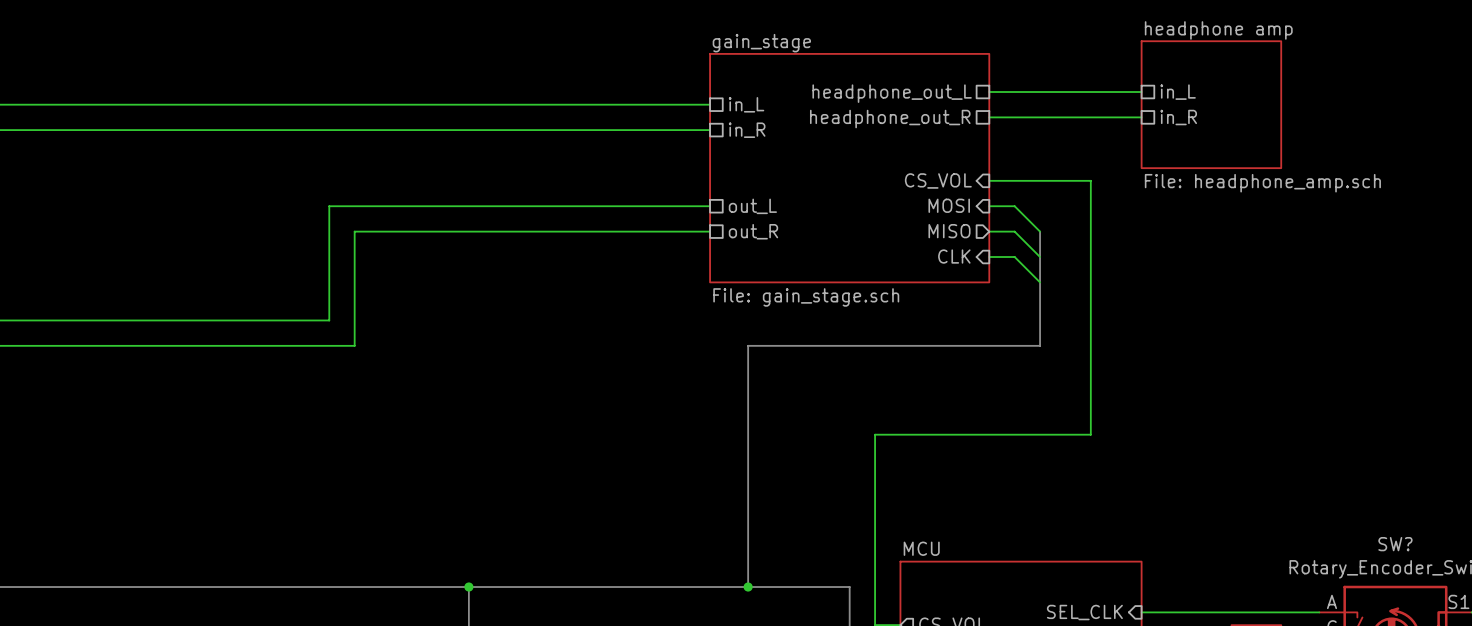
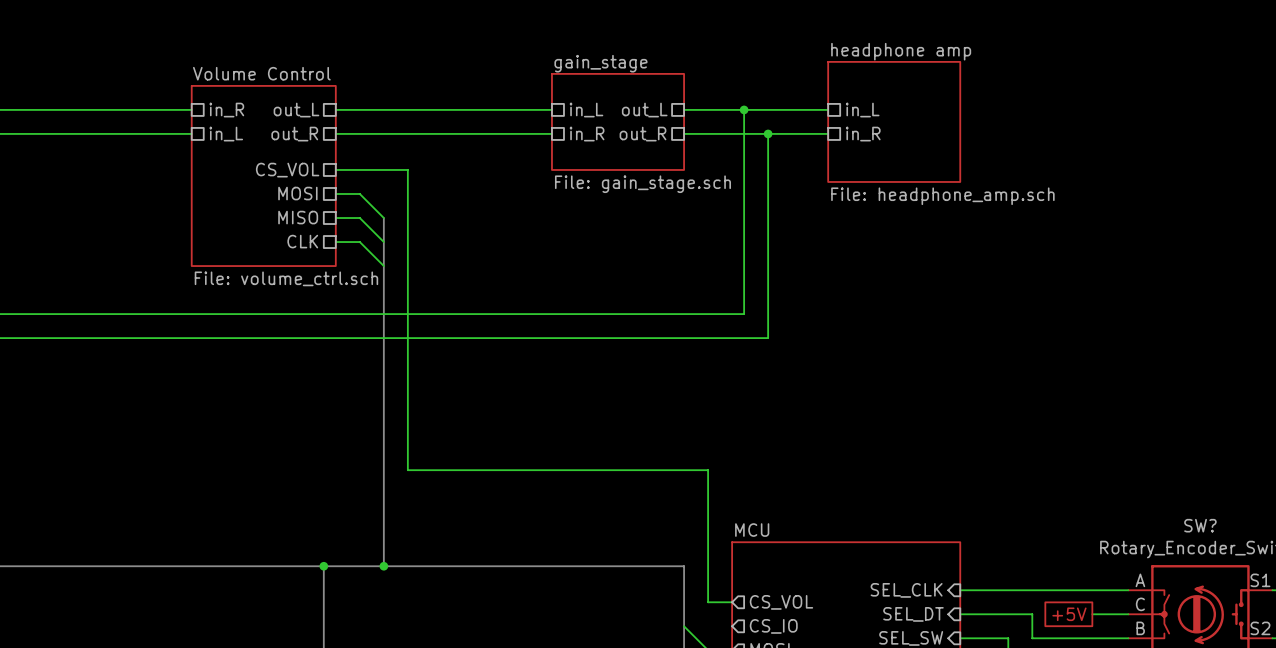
wire: (989, 92) (1141, 92) -> (684, 109) (828, 109)
sheet pin position: in_L (1178, 92) -> in_L (862, 110)
sheet pin: headphone_out_L (892, 93) -> none
wire: (329, 104) (481, 104) -> none
sheet pin: none -> in_R (226, 110)
sheet pin: none -> out_L (296, 110)
sheet pin: none -> out_L (644, 110)
junction: none -> (744, 109)
sheet headphone amp position: (1211, 104) -> (894, 121)
sheet gain_stage: none -> File: gain_stage.sch (618, 121)
wire: (989, 117) (1141, 117) -> (684, 133) (828, 133)
sheet pin position: in_R (1178, 117) -> in_R (863, 134)
sheet pin: headphone_out_R (890, 119) -> none
wire: (329, 130) (481, 130) -> none
sheet pin: none -> in_L (226, 134)
sheet pin: none -> out_R (294, 134)
sheet pin: none -> out_R (642, 134)
junction: none -> (768, 133)
sheet pin: none -> CS_VOL (287, 170)
sheet gain_stage: File: gain_stage.sch (849, 168) -> none
sheet Volume Control: none -> File: volume_ctrl.sch (263, 175)
sheet pin: CS_VOL (938, 180) -> none
wire: (989, 180) (1090, 180) (1090, 434) (875, 434) (875, 485) -> (335, 169) (407, 169) (407, 470) (708, 470)
sheet pin: none -> MOSI (297, 193)
wire: none -> (335, 193) (359, 193) (383, 218)
sheet pin: MOSI (949, 205) -> none
wire: (710, 206) (329, 206) (329, 320) -> (744, 109) (744, 314) (191, 314)
sheet pin: out_L (752, 206) -> none
wire: (989, 206) (1014, 206) (1040, 231) -> none
sheet pin: none -> MISO (298, 217)
wire: none -> (335, 218) (359, 218) (383, 242)
bus: none -> (383, 218) (383, 566)
wire: (710, 231) (354, 231) (354, 345) -> (768, 133) (768, 338) (215, 338)
sheet pin: out_R (753, 231) -> none
sheet pin: MISO (949, 231) -> none
wire: (989, 231) (1014, 231) (1040, 257) -> none
bus: (1040, 231) (1040, 345) (748, 345) (748, 587) -> none
sheet pin: none -> CLK (302, 241)
wire: none -> (335, 242) (359, 242) (383, 266)
sheet pin: CLK (954, 256) -> none
wire: (989, 257) (1014, 257) (1040, 282) -> none
junction: none -> (383, 566)
junction: (748, 587) -> none

